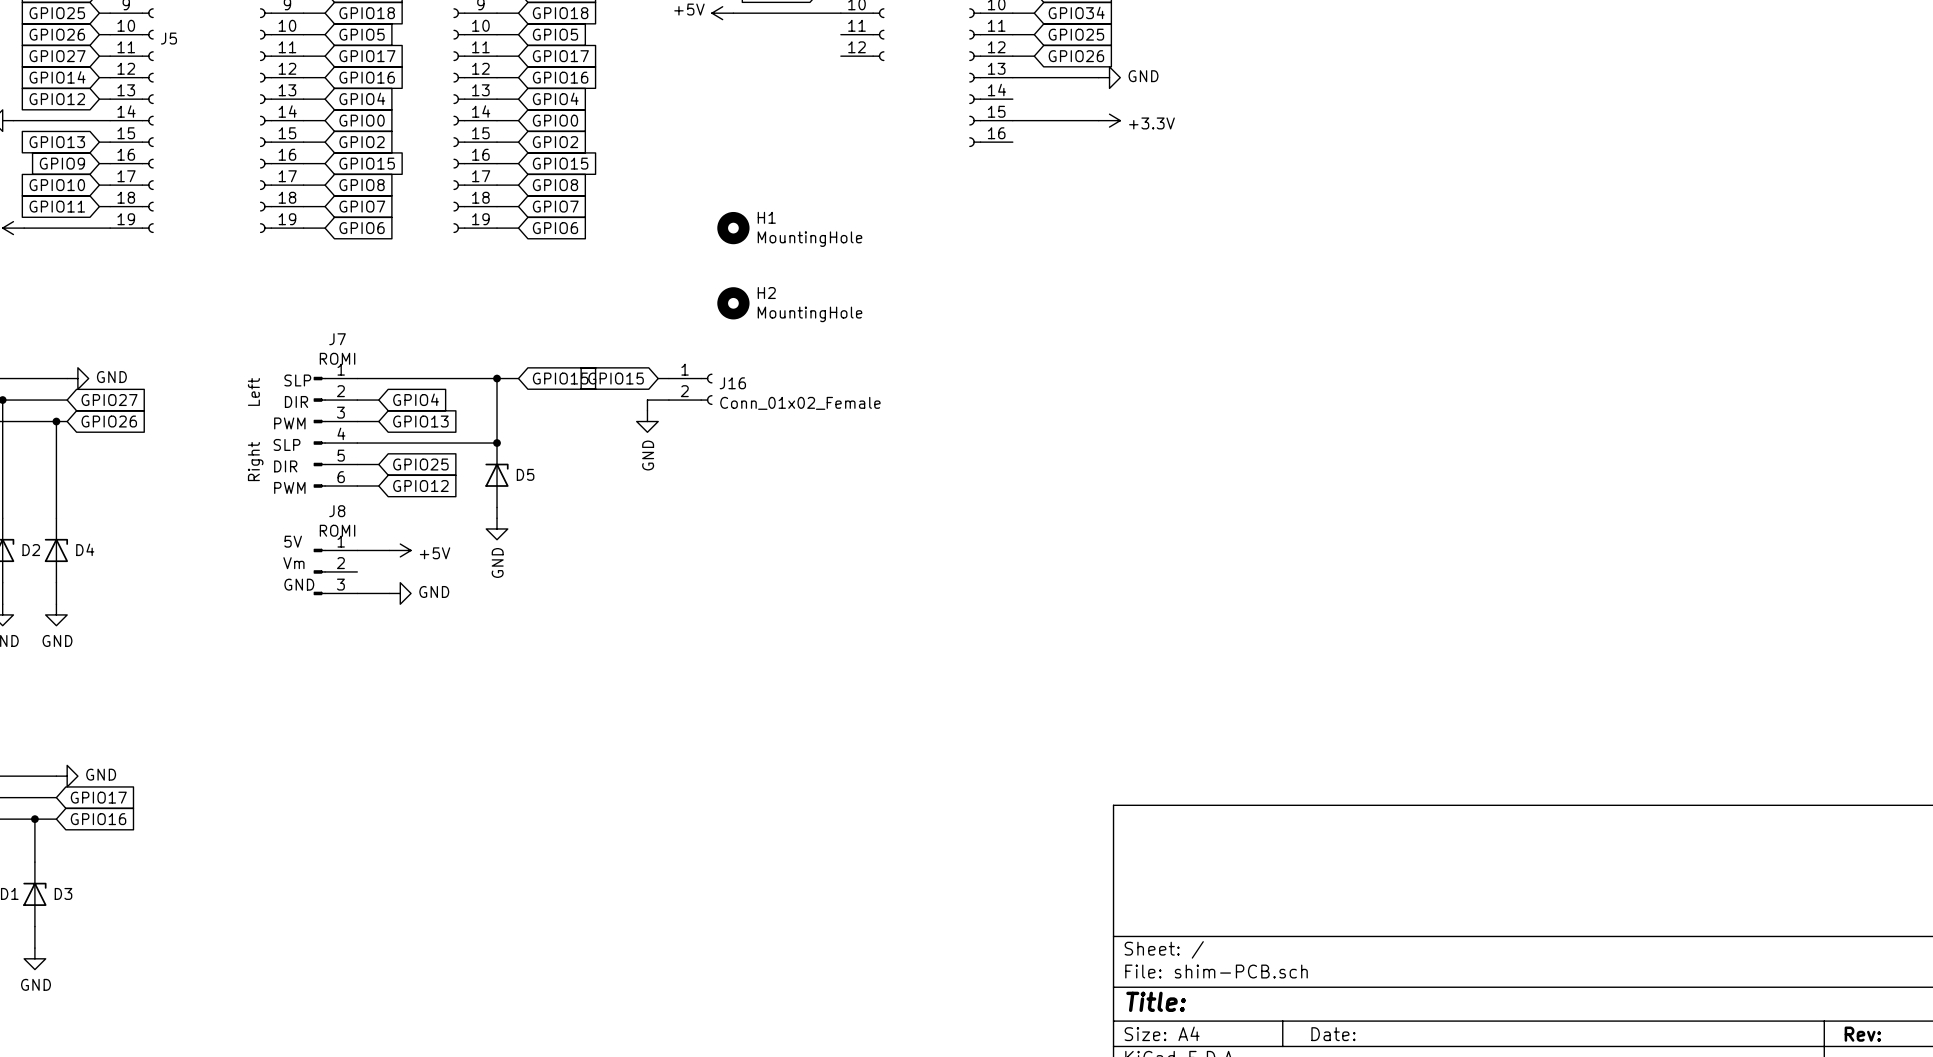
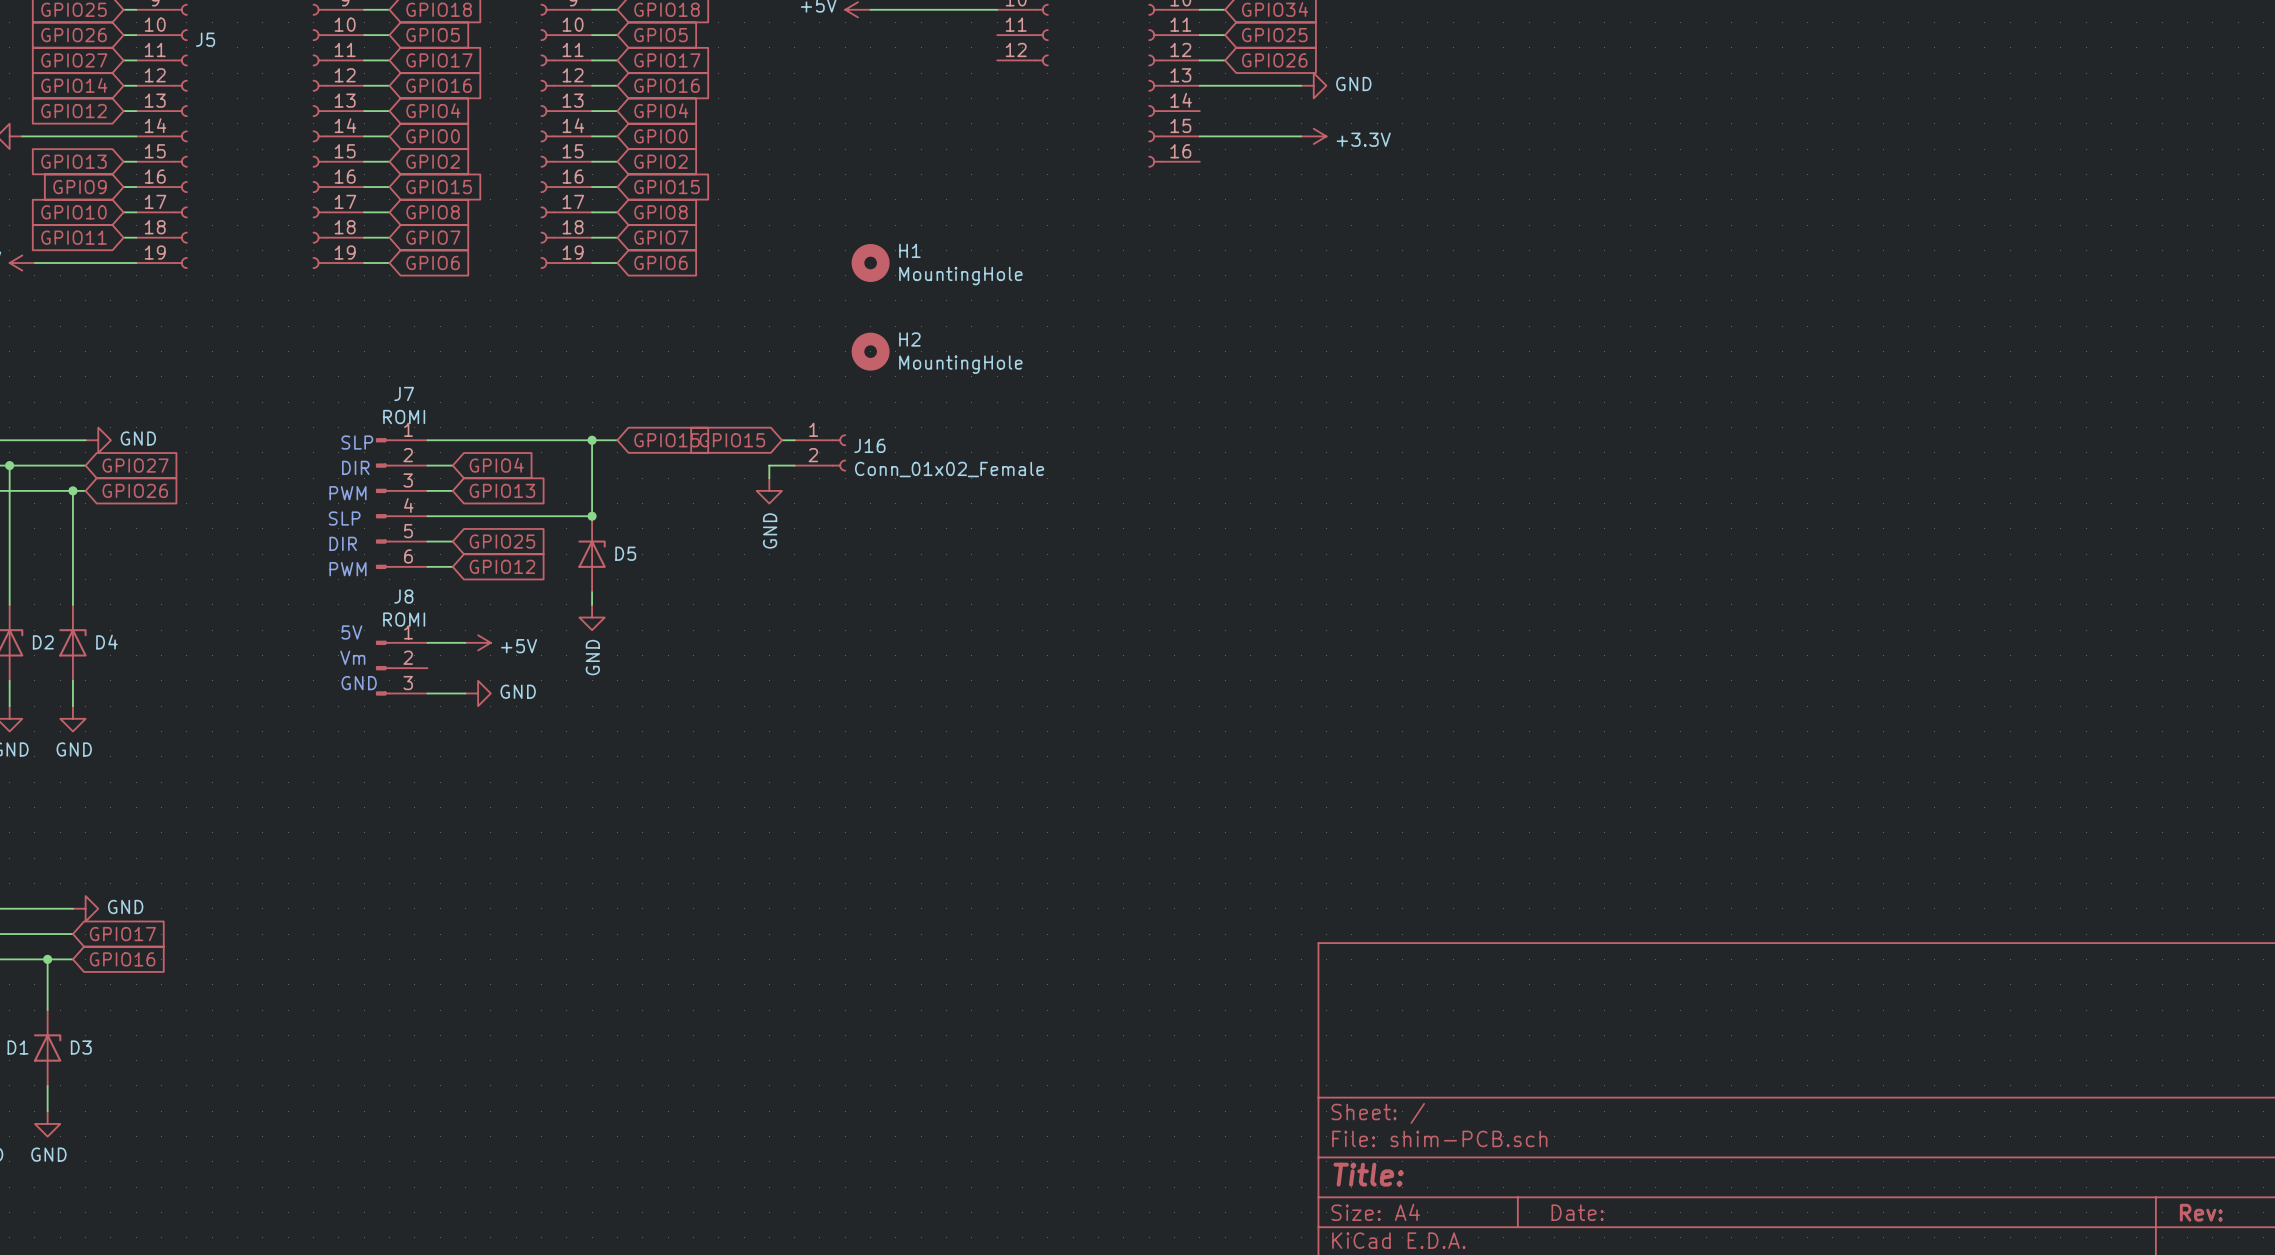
text: Left (253, 391) -> none
text: Right (255, 461) -> none

